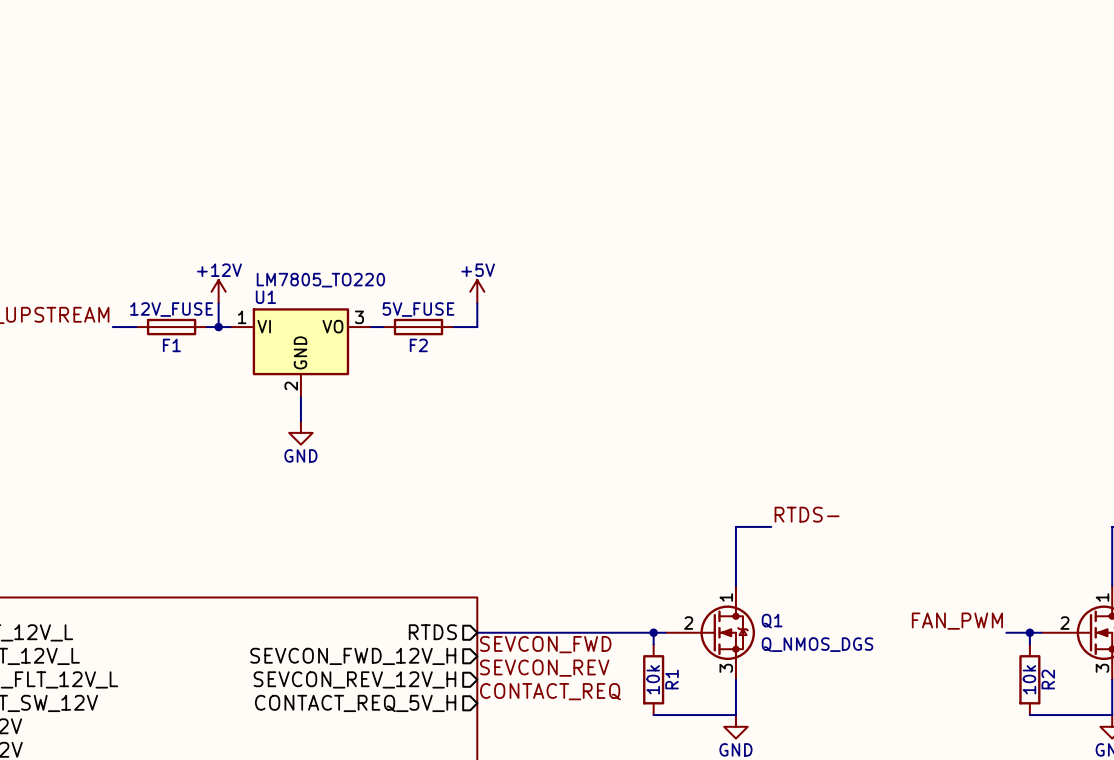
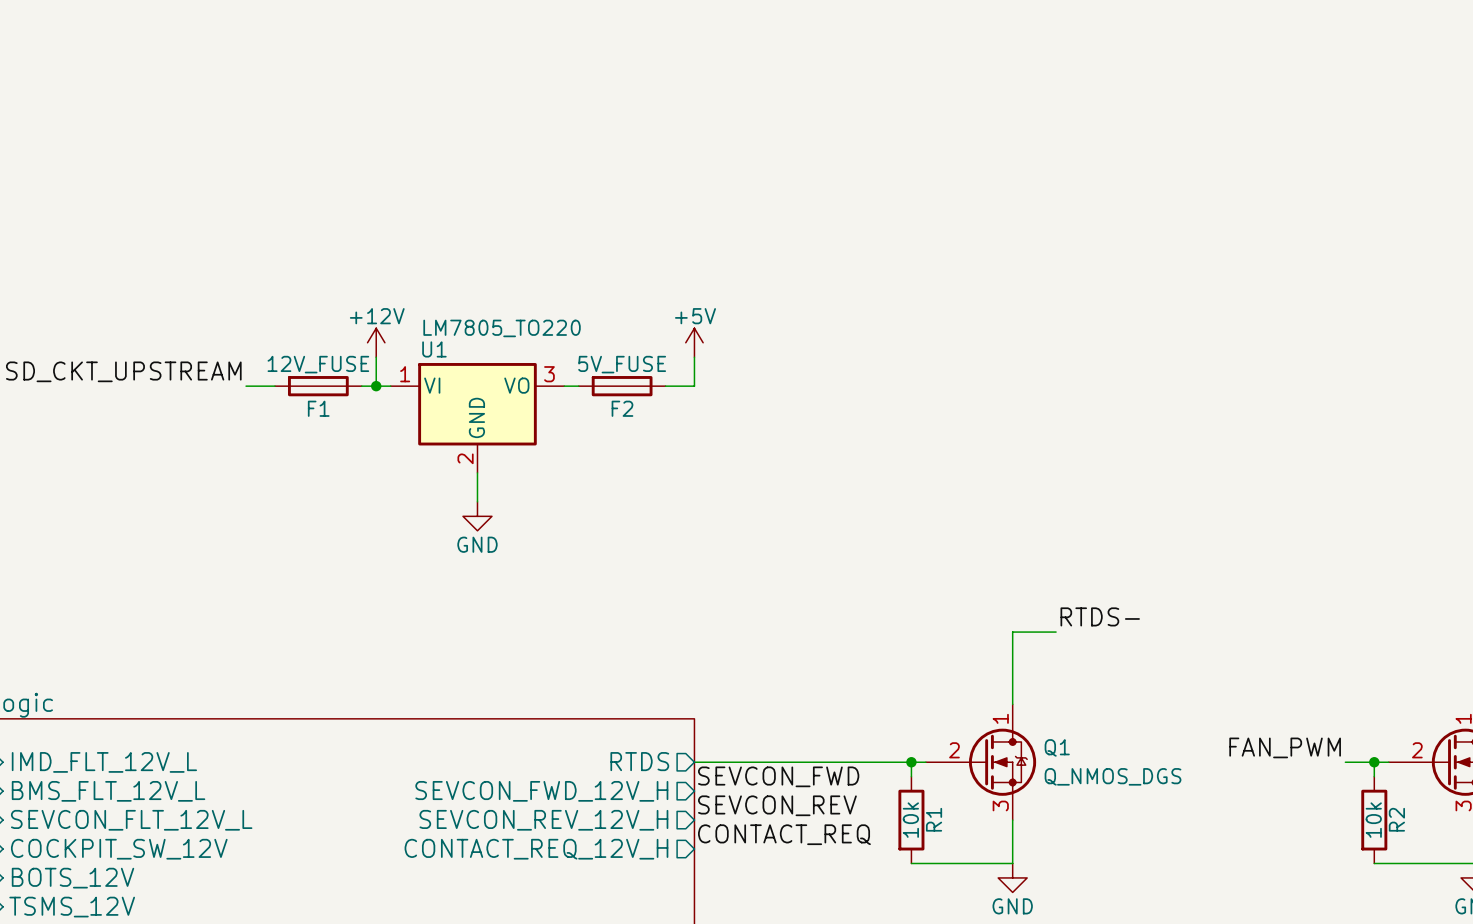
sheet pin: CONTACT_REQ_5V_H (355, 703) -> CONTACT_REQ_12V_H (536, 849)

